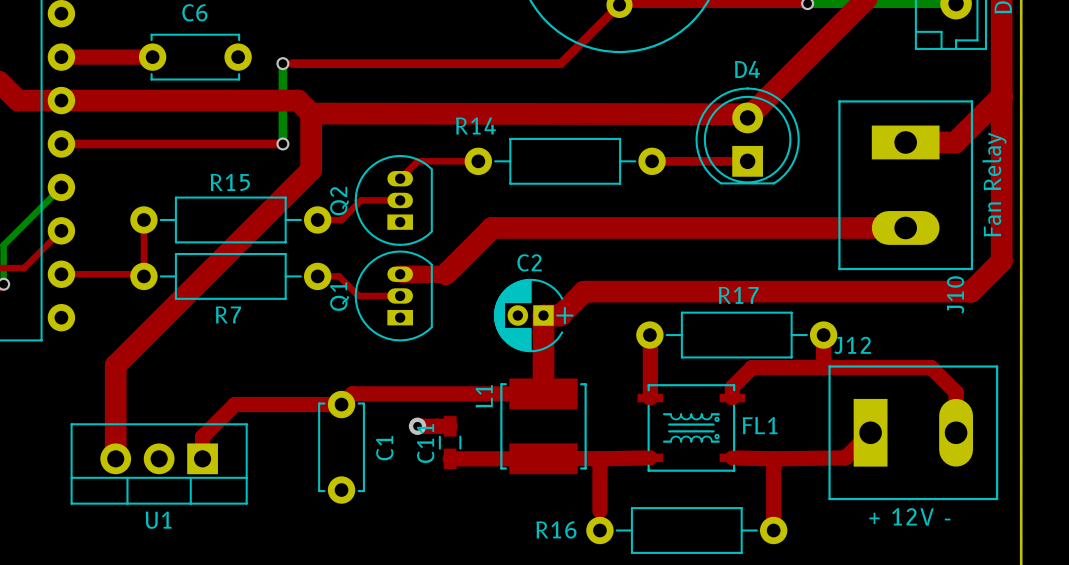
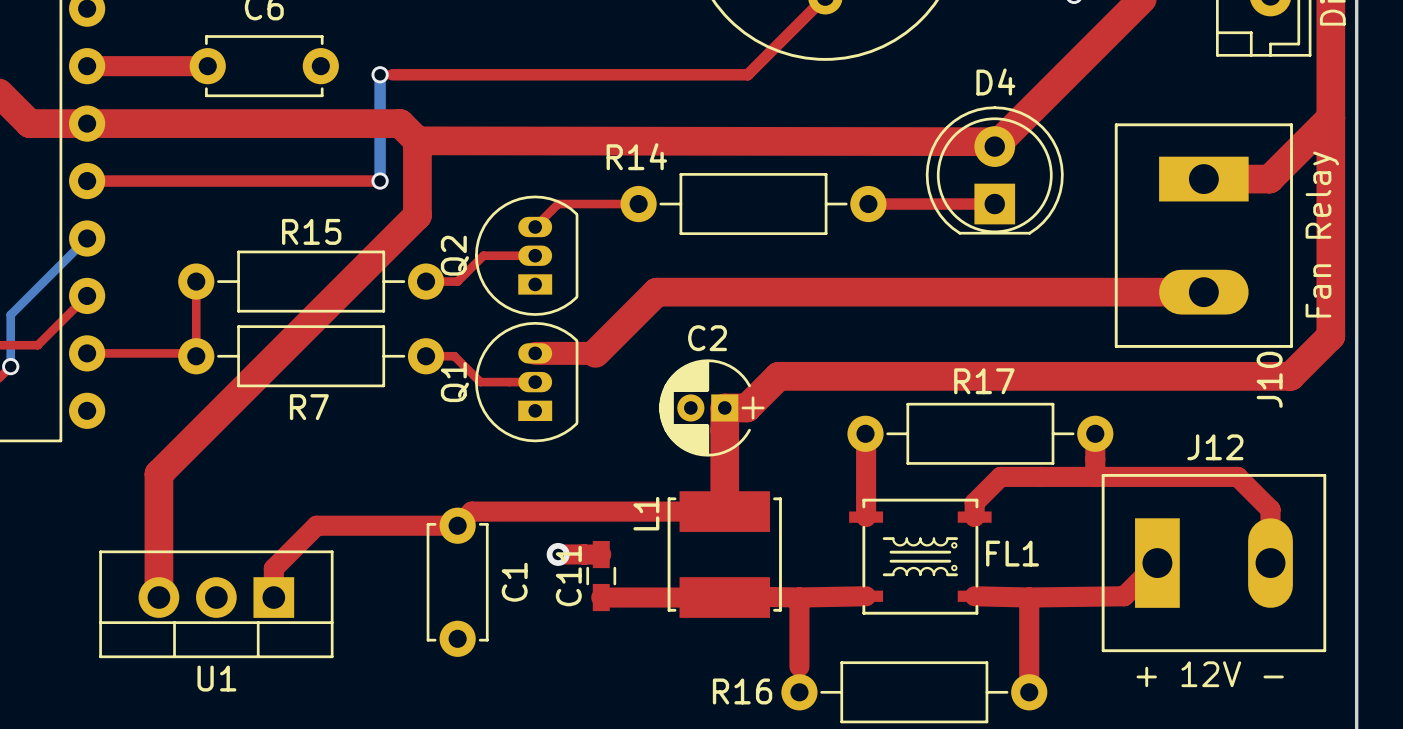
J12 name position: J12 (852, 345) -> J12 (1215, 447)

